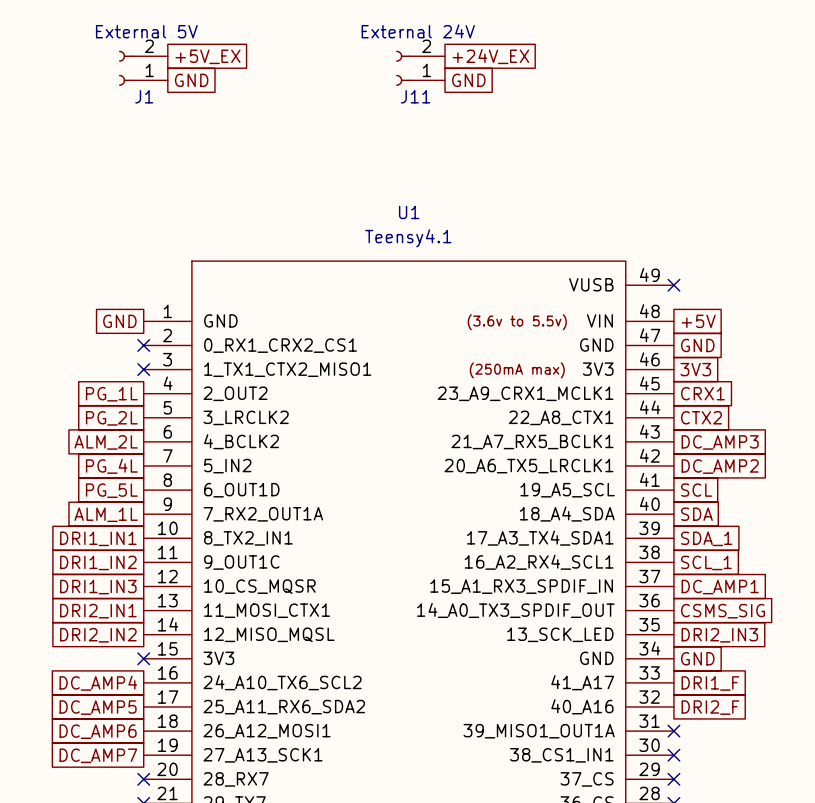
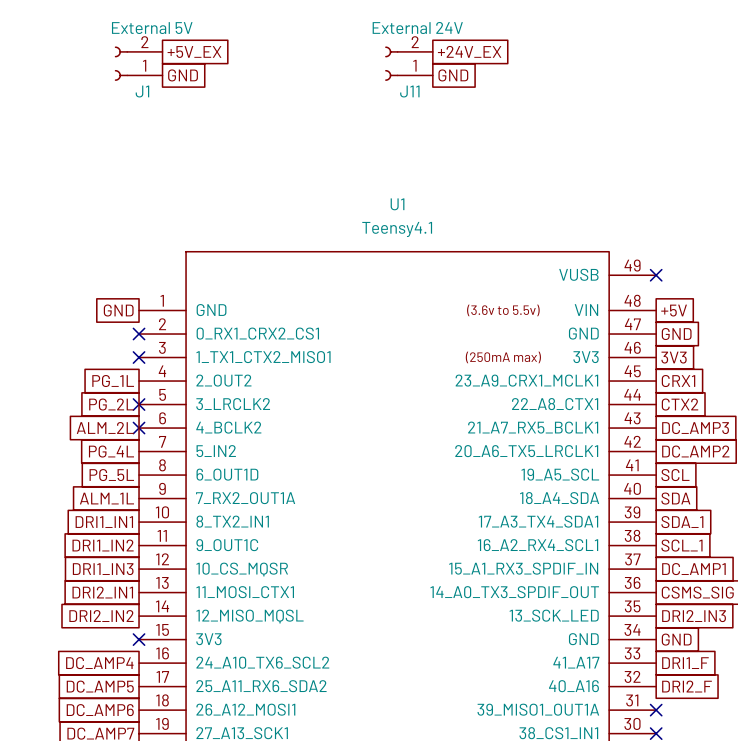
no-connect mark: none -> (139, 404)
no-connect mark: none -> (139, 428)

